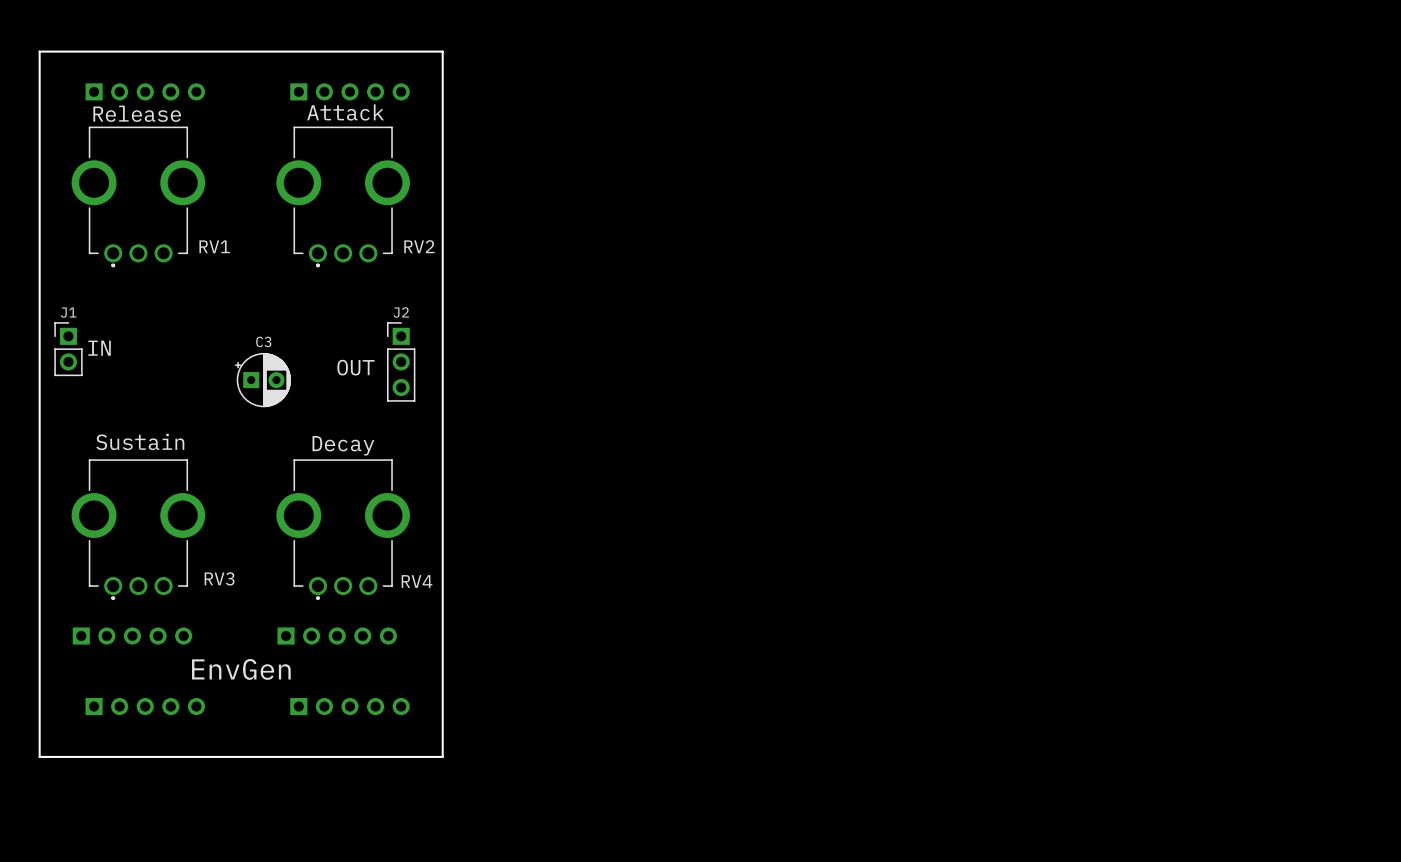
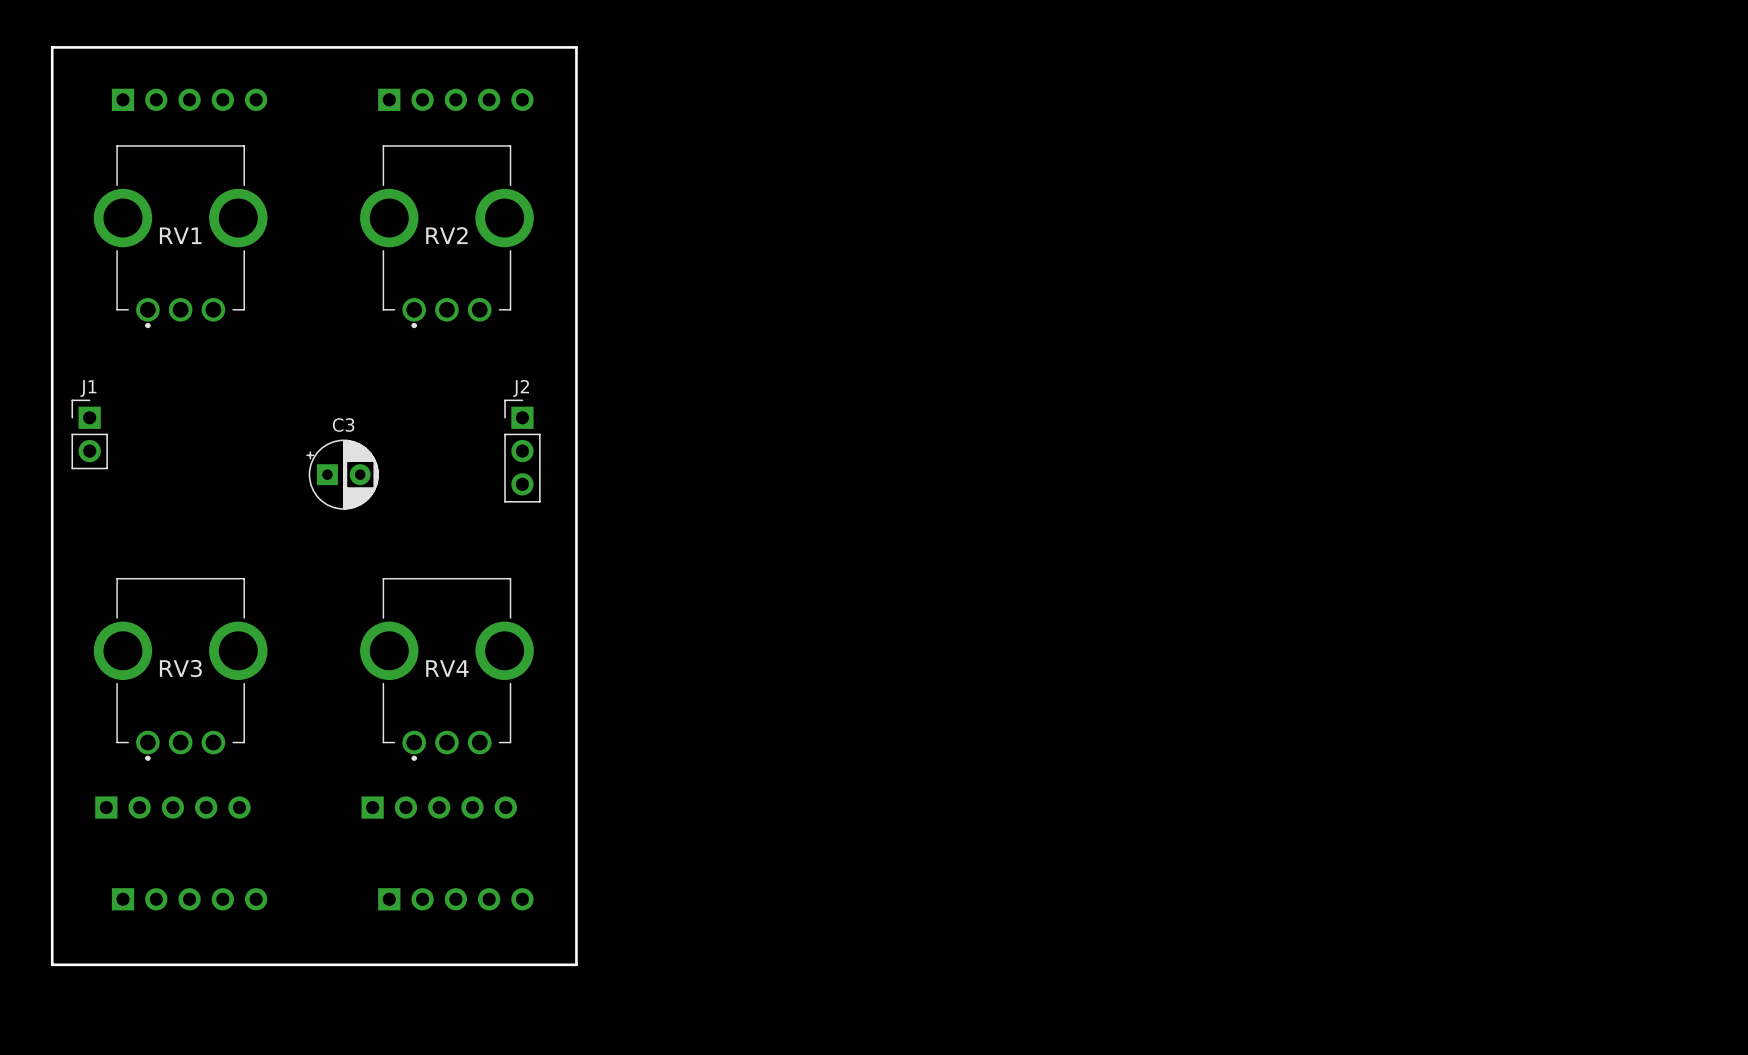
text: Attack (345, 112) -> none
text: Release (137, 113) -> none
RV1 name position: RV1 (214, 246) -> RV1 (180, 235)
RV2 name position: RV2 (419, 246) -> RV2 (446, 235)
text: IN (99, 348) -> none
text: OUT (355, 367) -> none
text: Sustain (140, 441) -> none
text: Decay (343, 445) -> none
RV3 name position: RV3 (219, 578) -> RV3 (180, 668)
RV4 name position: RV4 (416, 581) -> RV4 (447, 668)
text: EnvGen (241, 669) -> none

